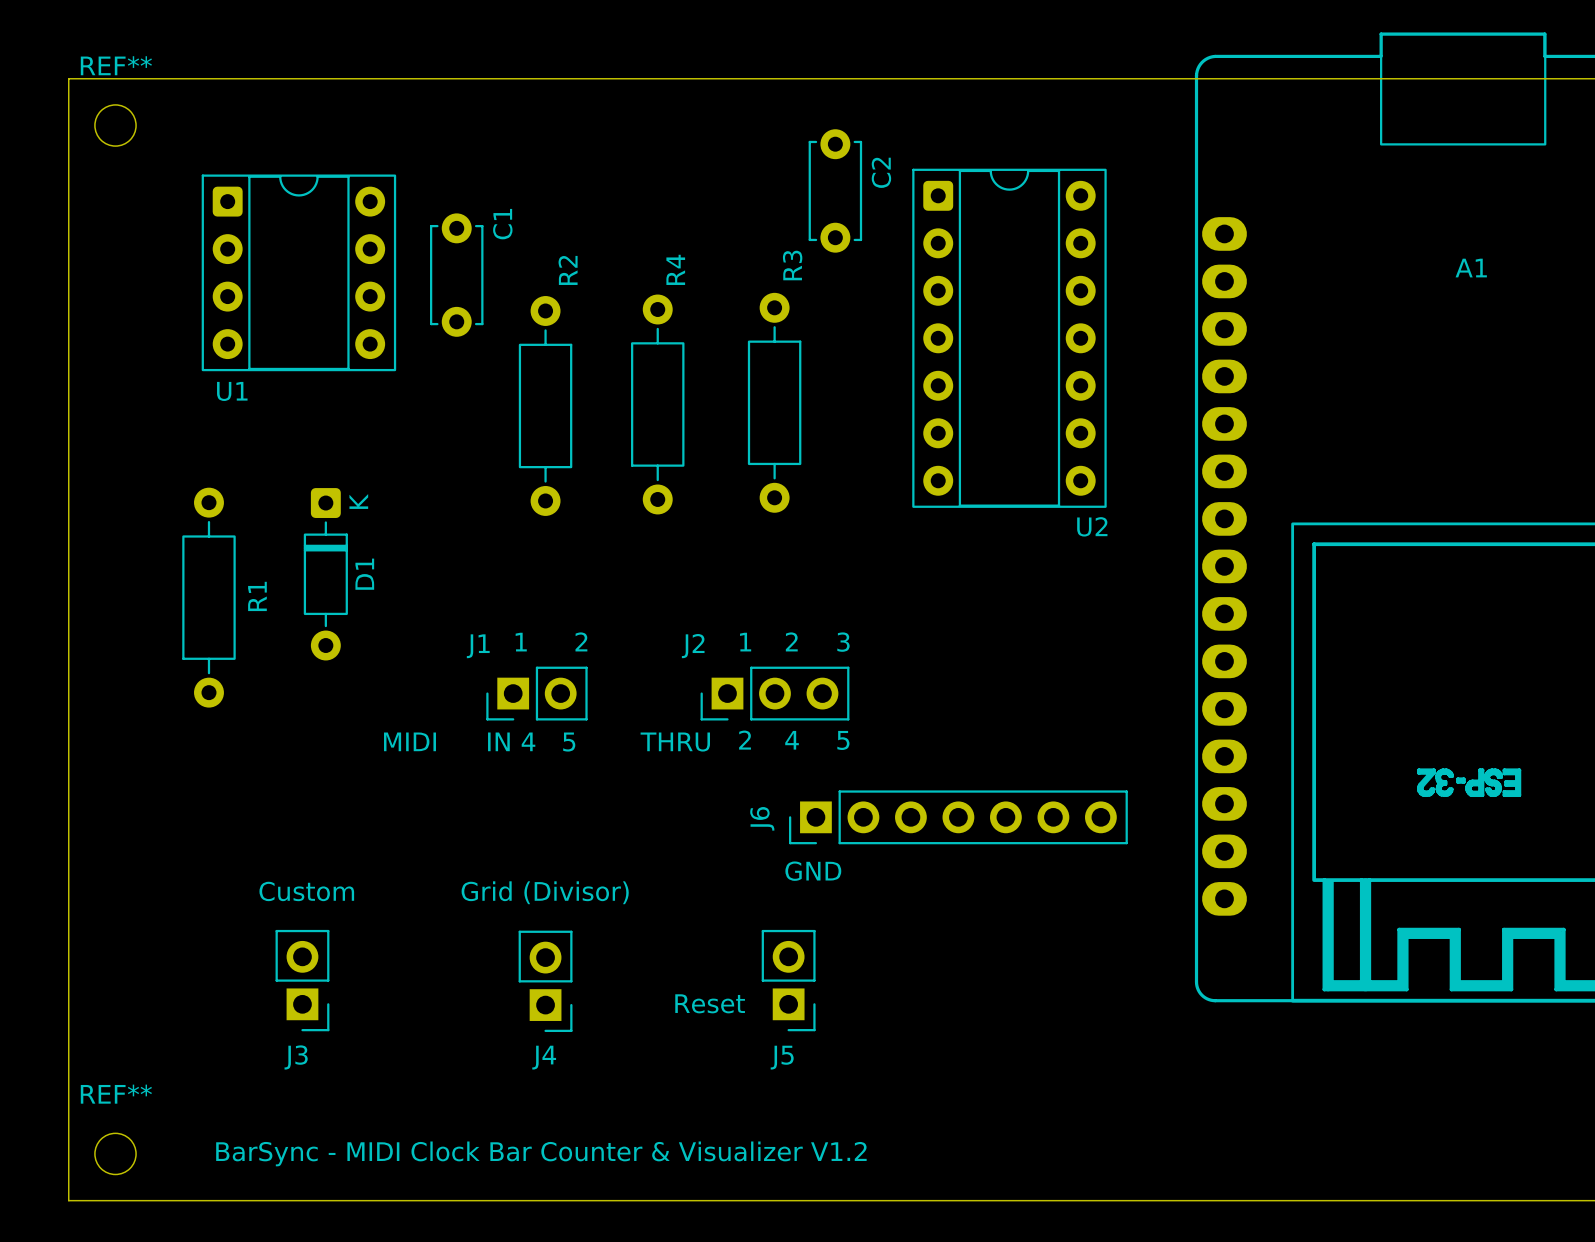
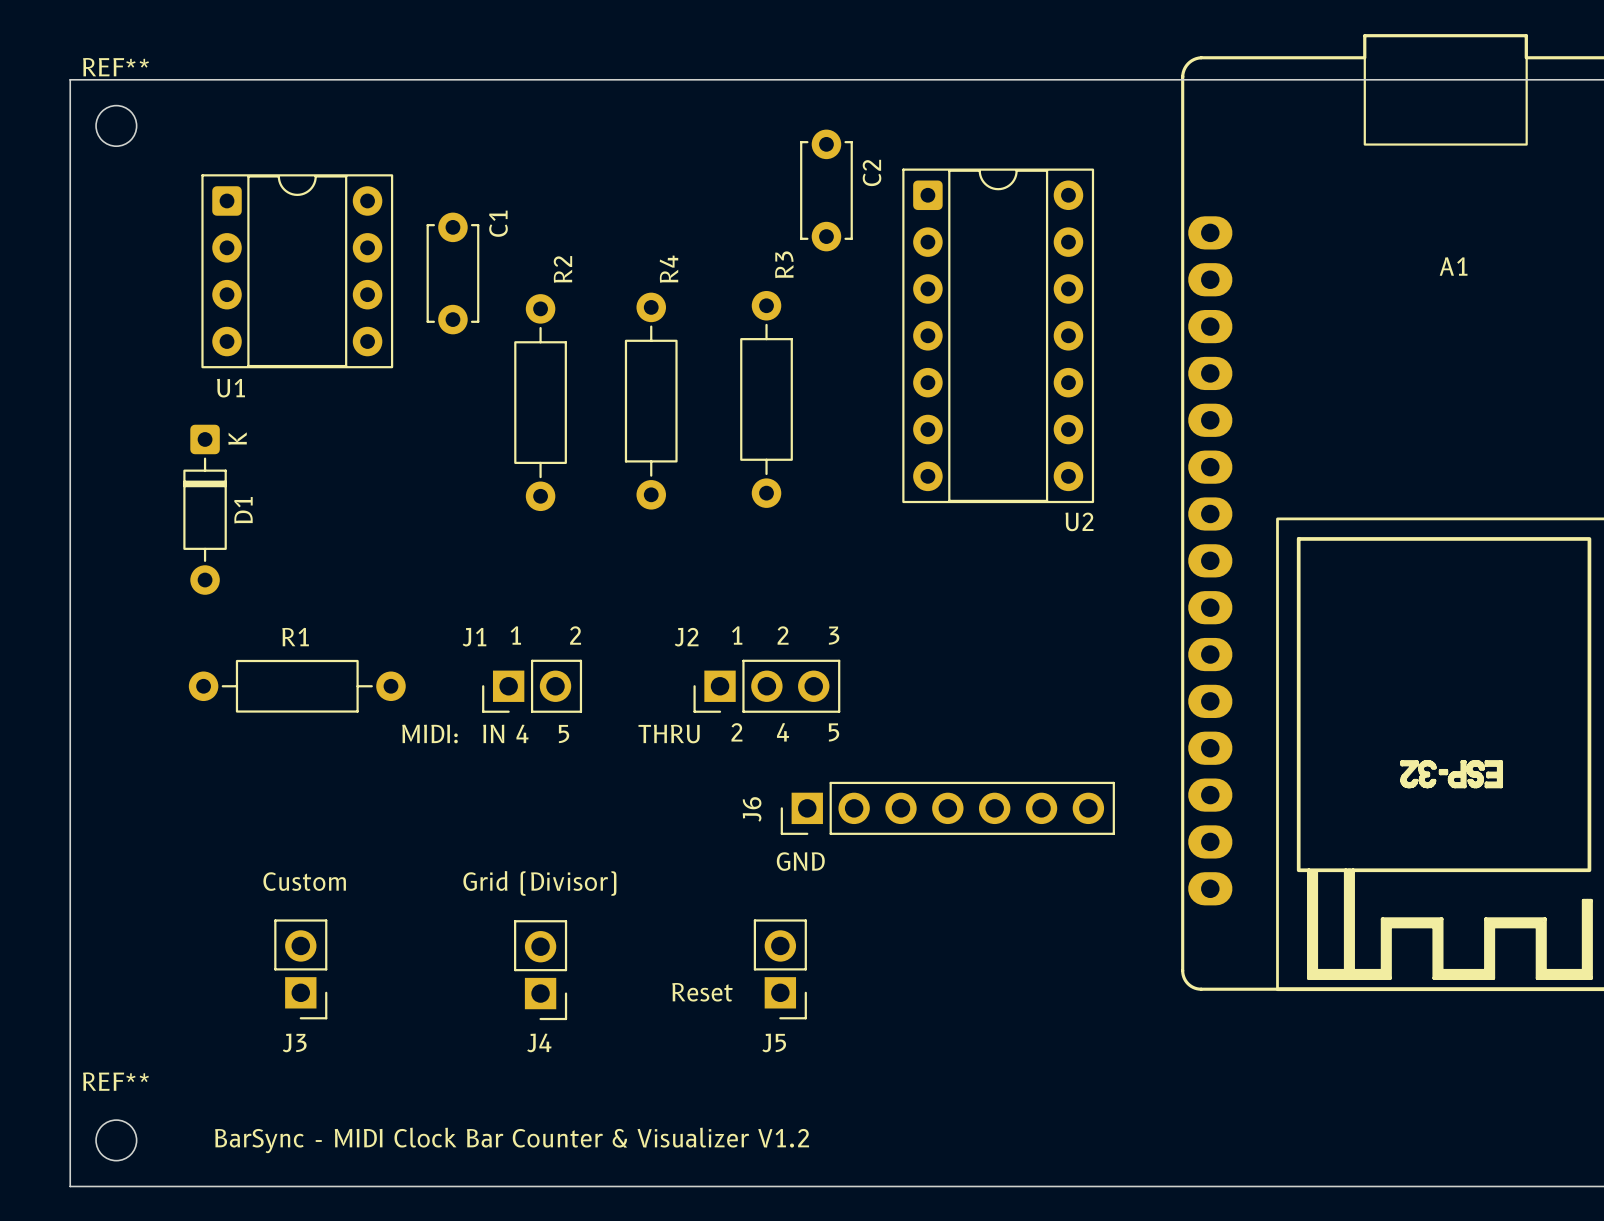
D1 position: (325, 574) -> (205, 509)
R1 name position: R1 (257, 596) -> R1 (295, 637)
R1 rotation: 0° (208, 597) -> 90° clockwise (297, 686)
J1 value: MIDI (409, 741) -> MIDI: (430, 734)

